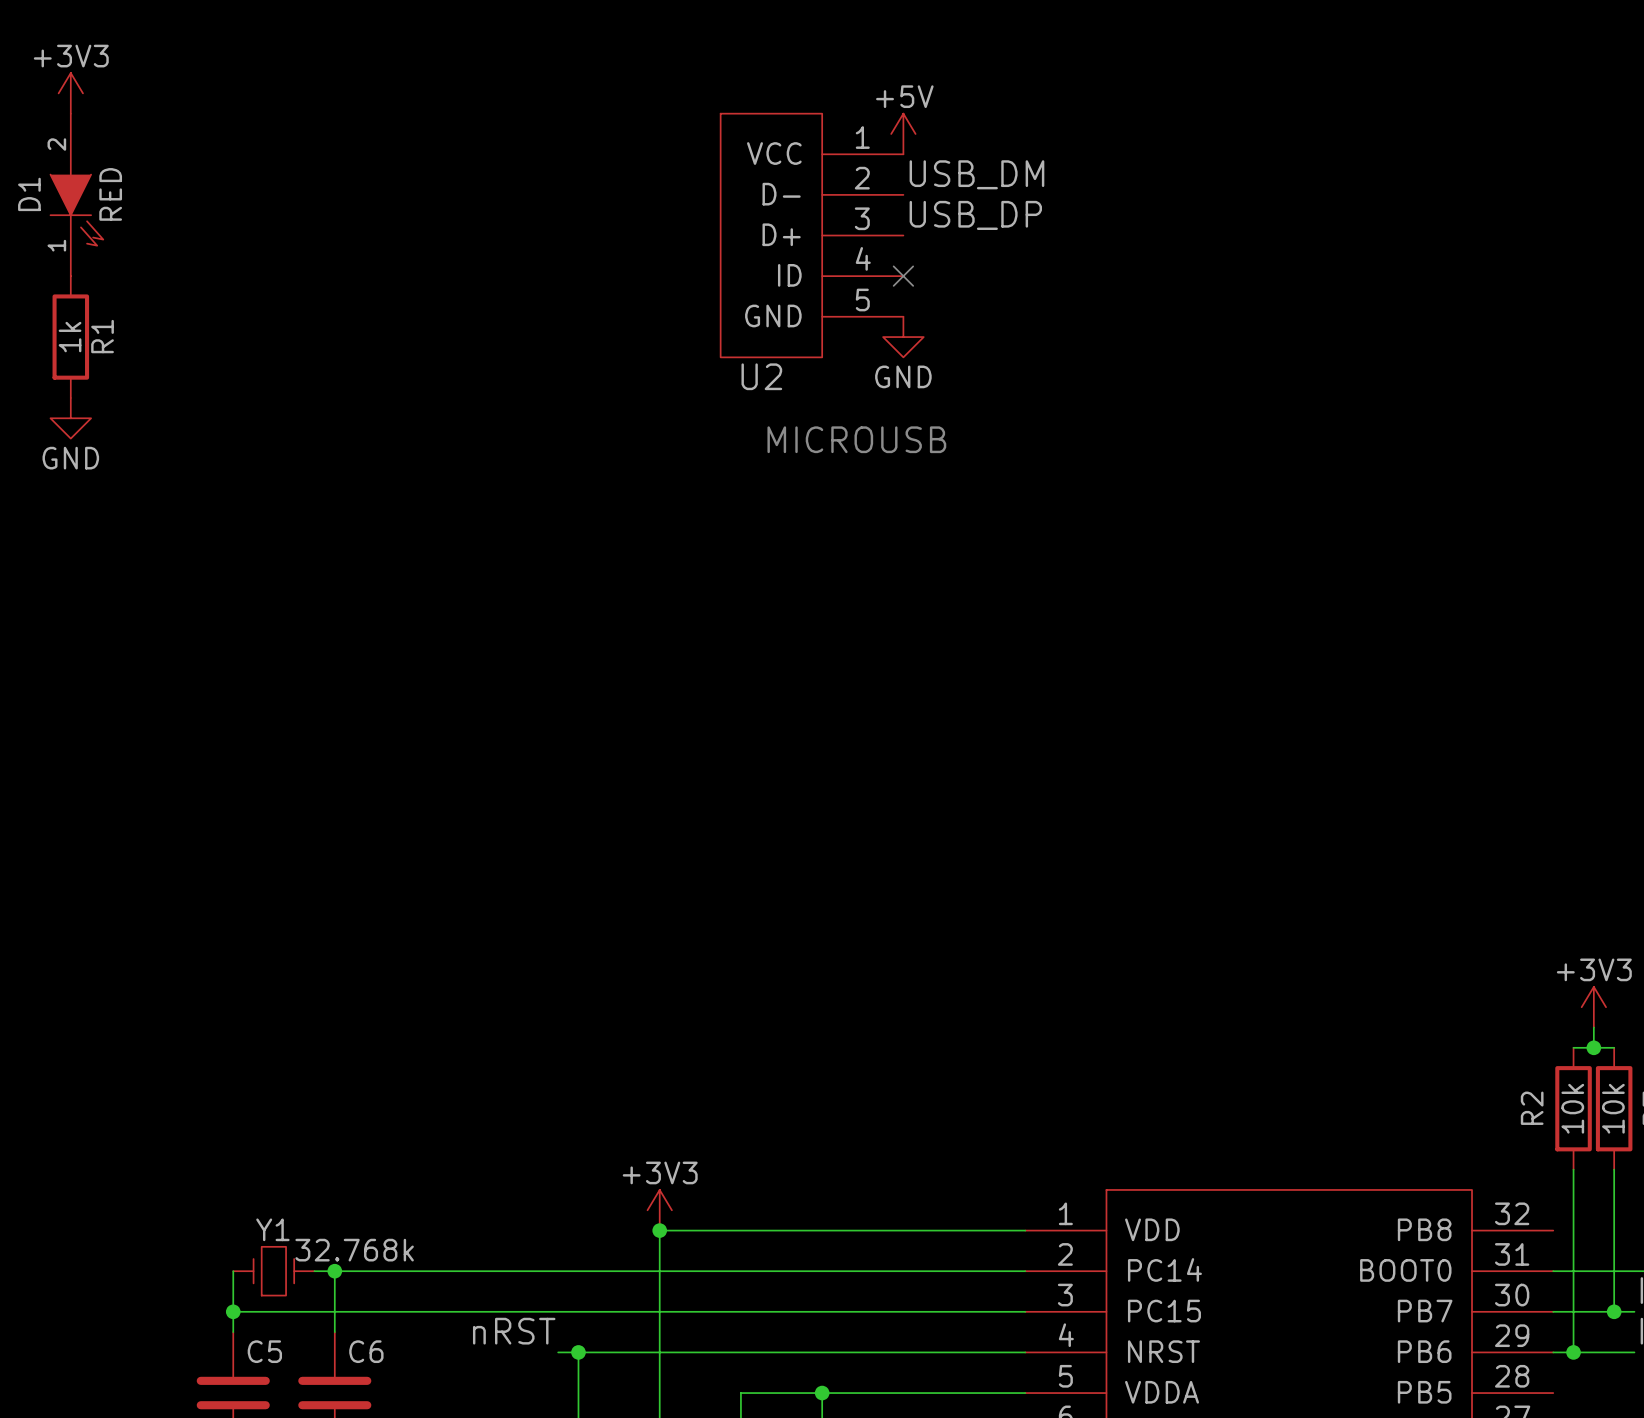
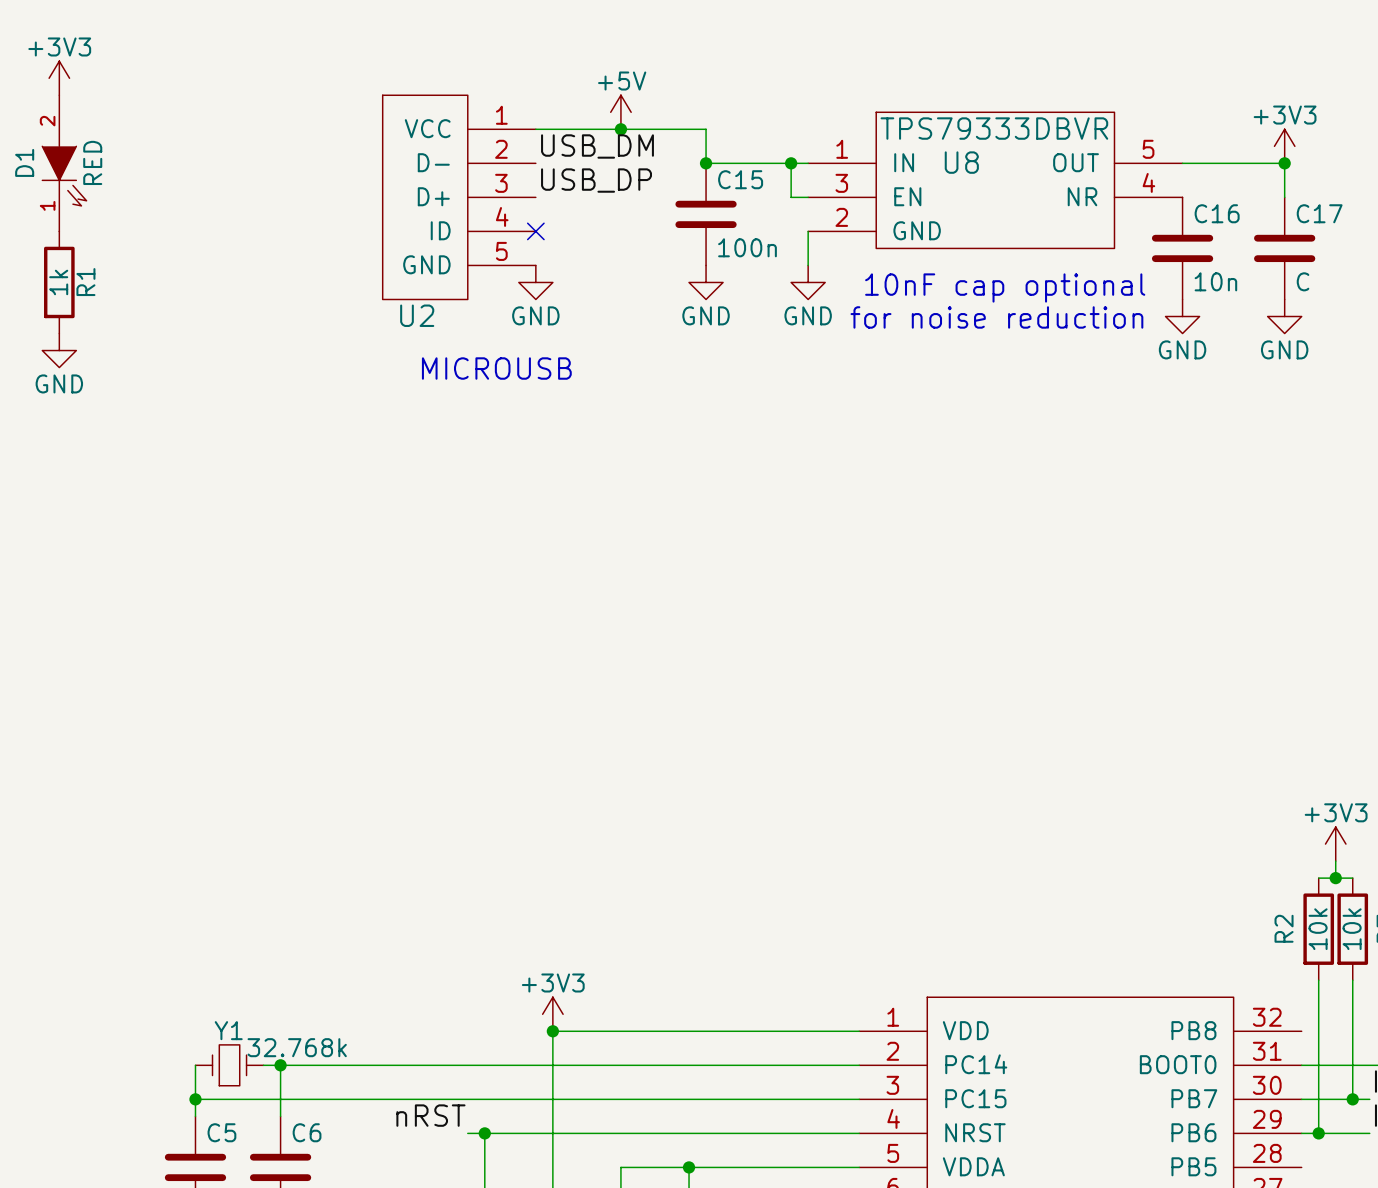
power symbol position: +5V (903, 133) -> +5V (620, 112)
wire: none -> (535, 129) (706, 129) (706, 163) (808, 163)
junction: none -> (620, 129)
label position: USB_DM (976, 174) -> USB_DM (597, 146)
power symbol: none -> +3V3 (1284, 146)
junction: none -> (706, 163)
wire: none -> (791, 163) (791, 197) (808, 197)
junction: none -> (791, 163)
wire: none -> (1182, 163) (1284, 163) (1284, 197)
junction: none -> (1284, 163)
label position: USB_DP (975, 215) -> USB_DP (596, 180)
U8: none -> TPS79333DBVR (995, 180)
U2 position: (812, 235) -> (459, 197)
C15: none -> 100n (706, 214)
no-connect mark: none -> (535, 231)
no-connect mark: (903, 276) -> none
wire: none -> (808, 231) (808, 265)
C16: none -> 10n (1182, 248)
C17: none -> C (1284, 248)
power symbol: none -> GND (535, 282)
power symbol: none -> GND (706, 282)
power symbol: GND (903, 337) -> none
power symbol: none -> GND (808, 282)
text: none -> 10nF cap optional (1005, 287)
power symbol: none -> GND (1182, 316)
power symbol: none -> GND (1284, 316)
text: none -> for noise reduction (996, 317)
text position: MICROUSB (856, 439) -> MICROUSB (496, 368)

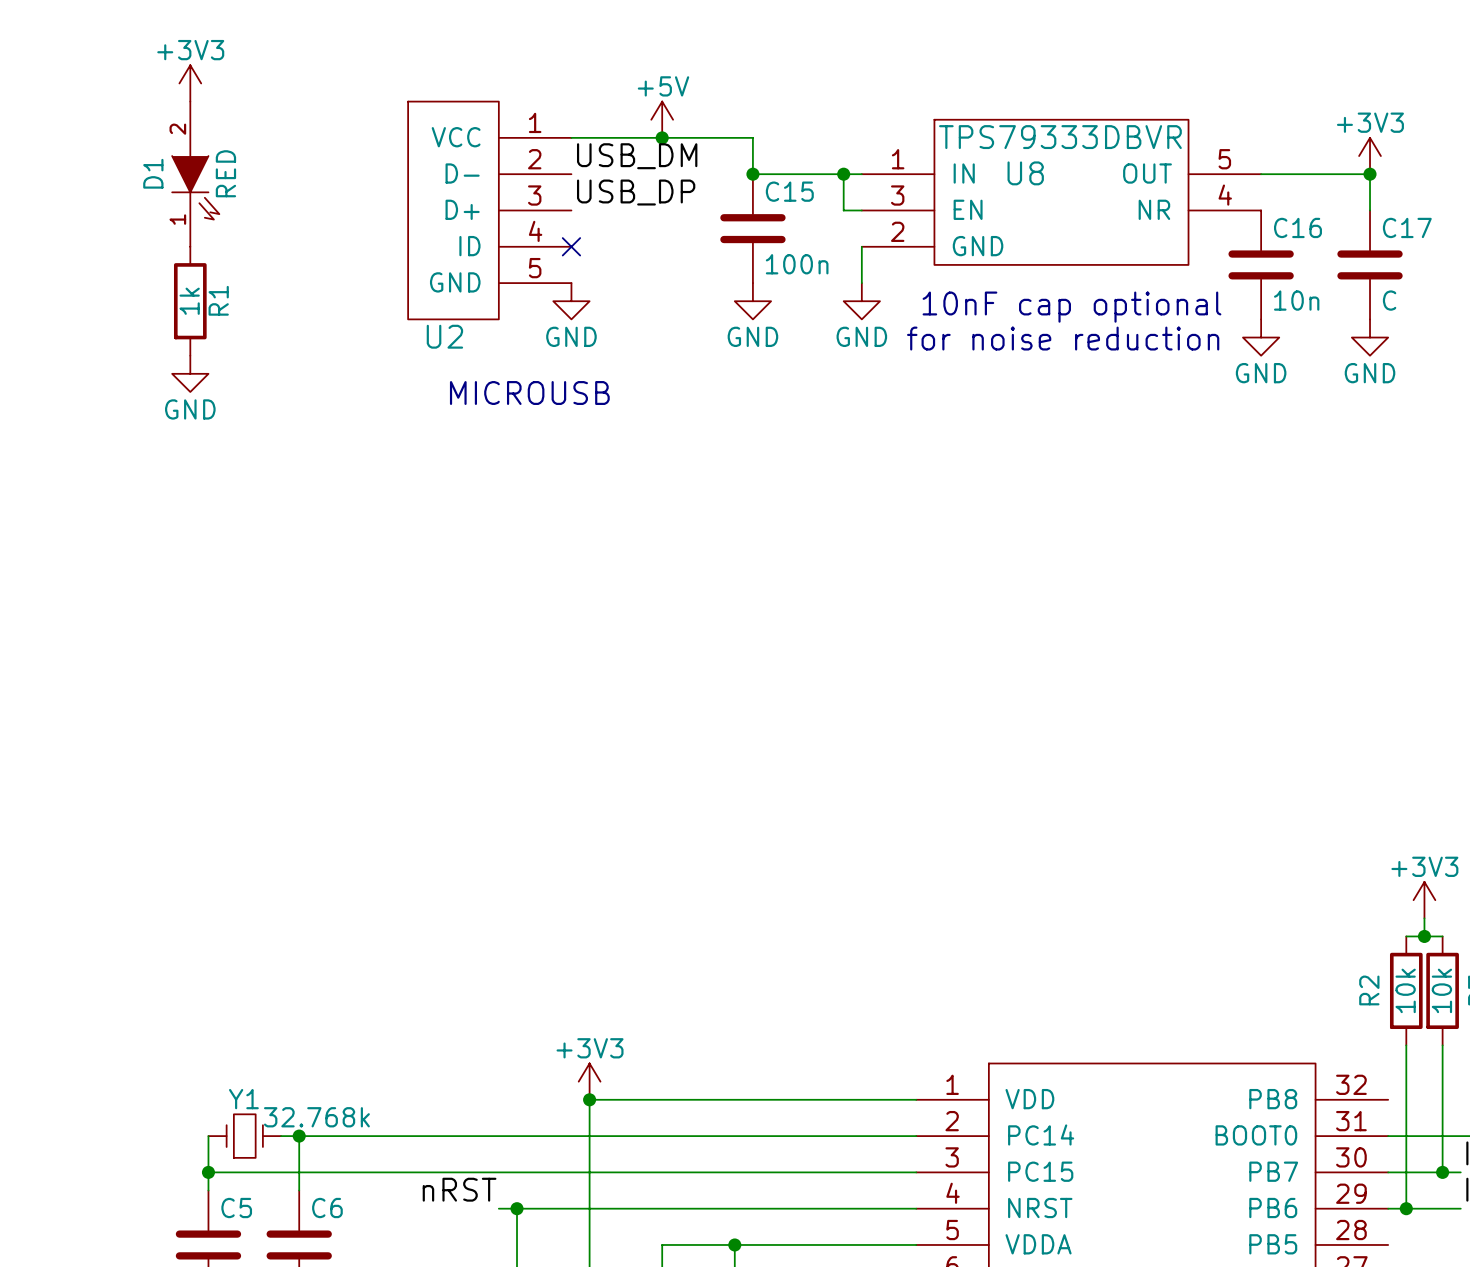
power symbol position: +3V3 (59, 78) -> +3V3 (190, 83)
D1 position: (64, 163) -> (195, 174)
R1 position: (59, 282) -> (190, 301)
power symbol position: GND (59, 350) -> GND (190, 373)

